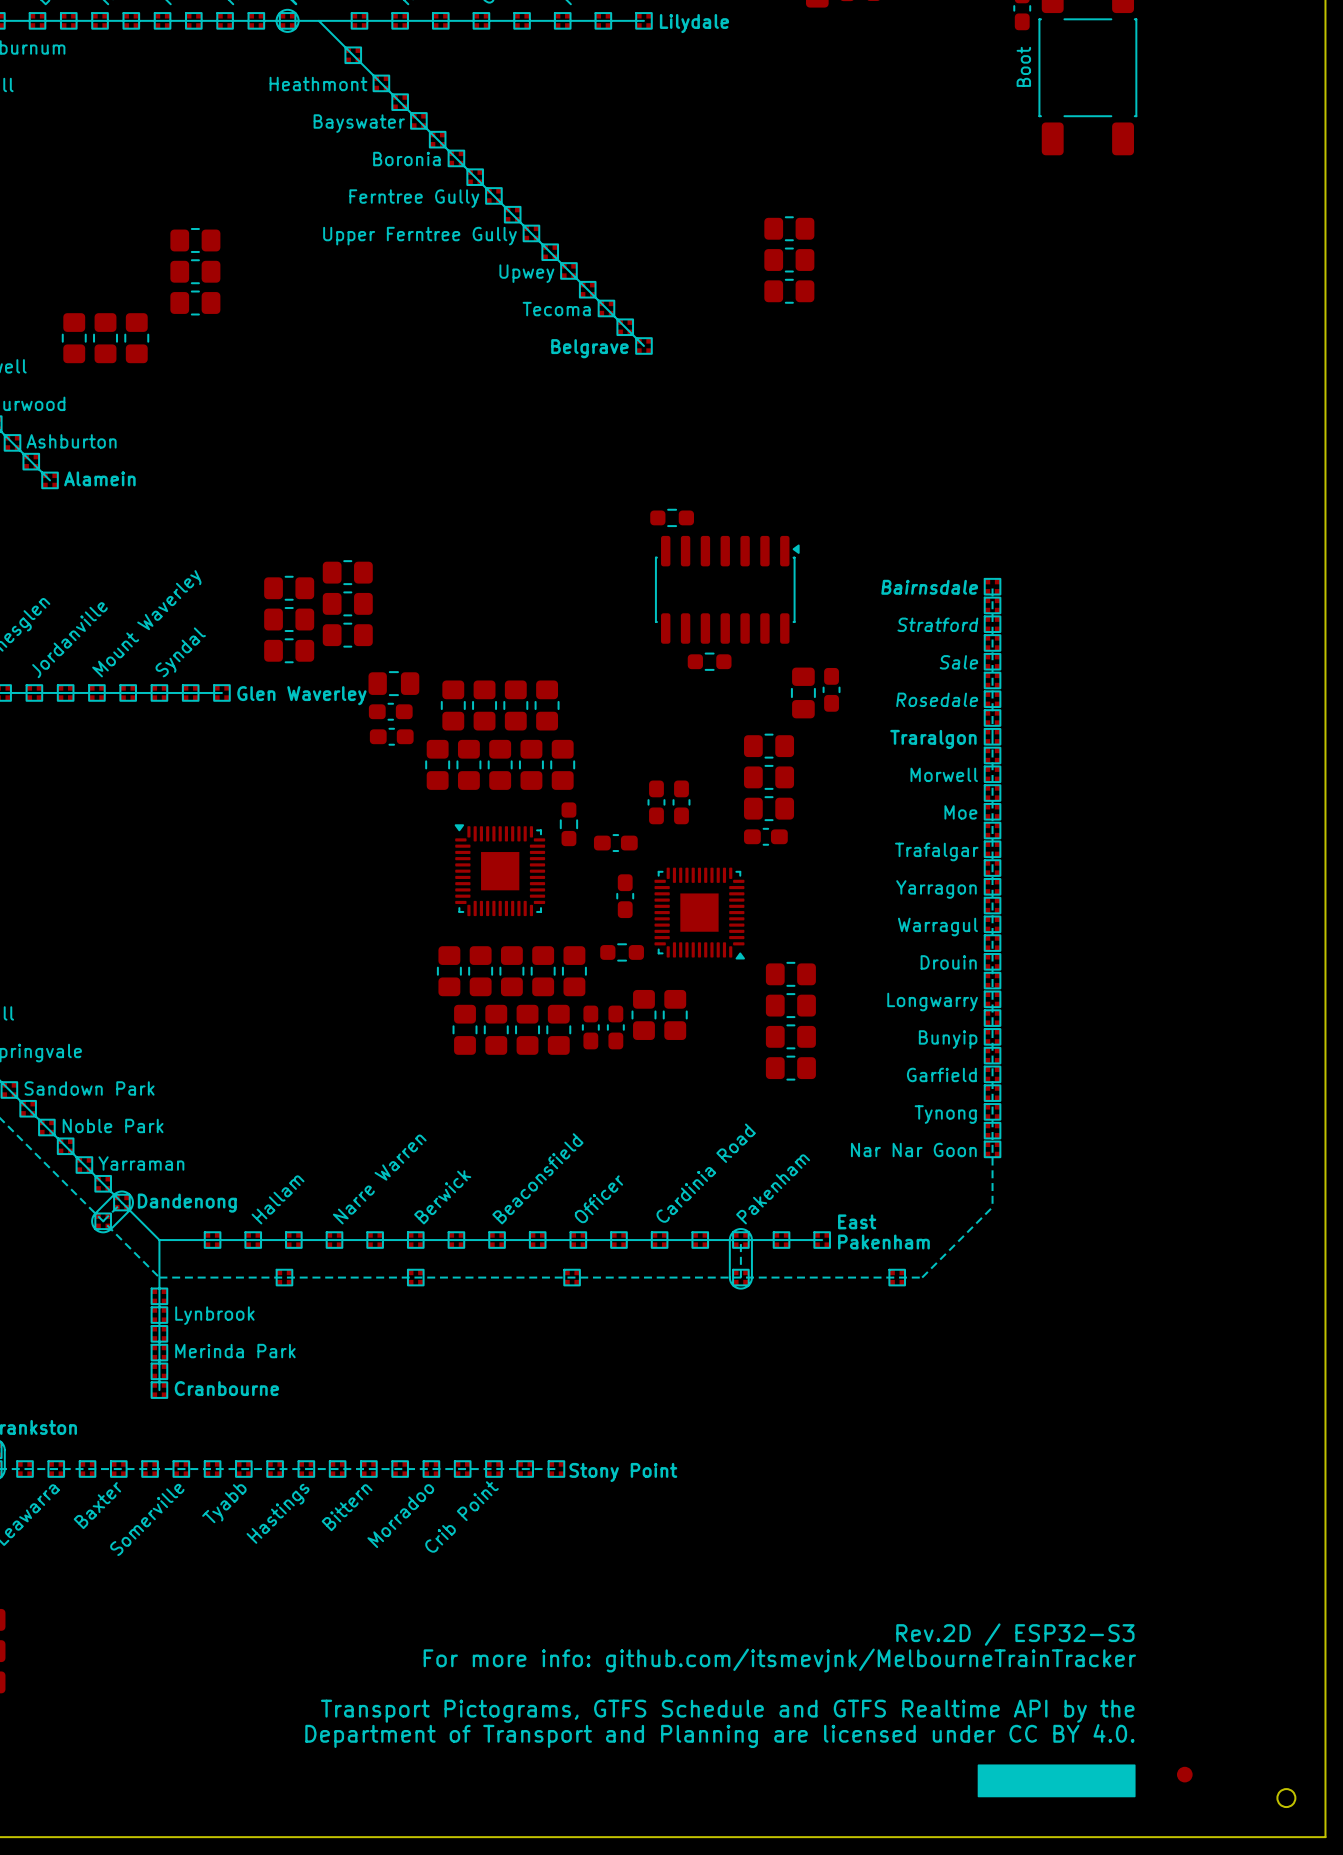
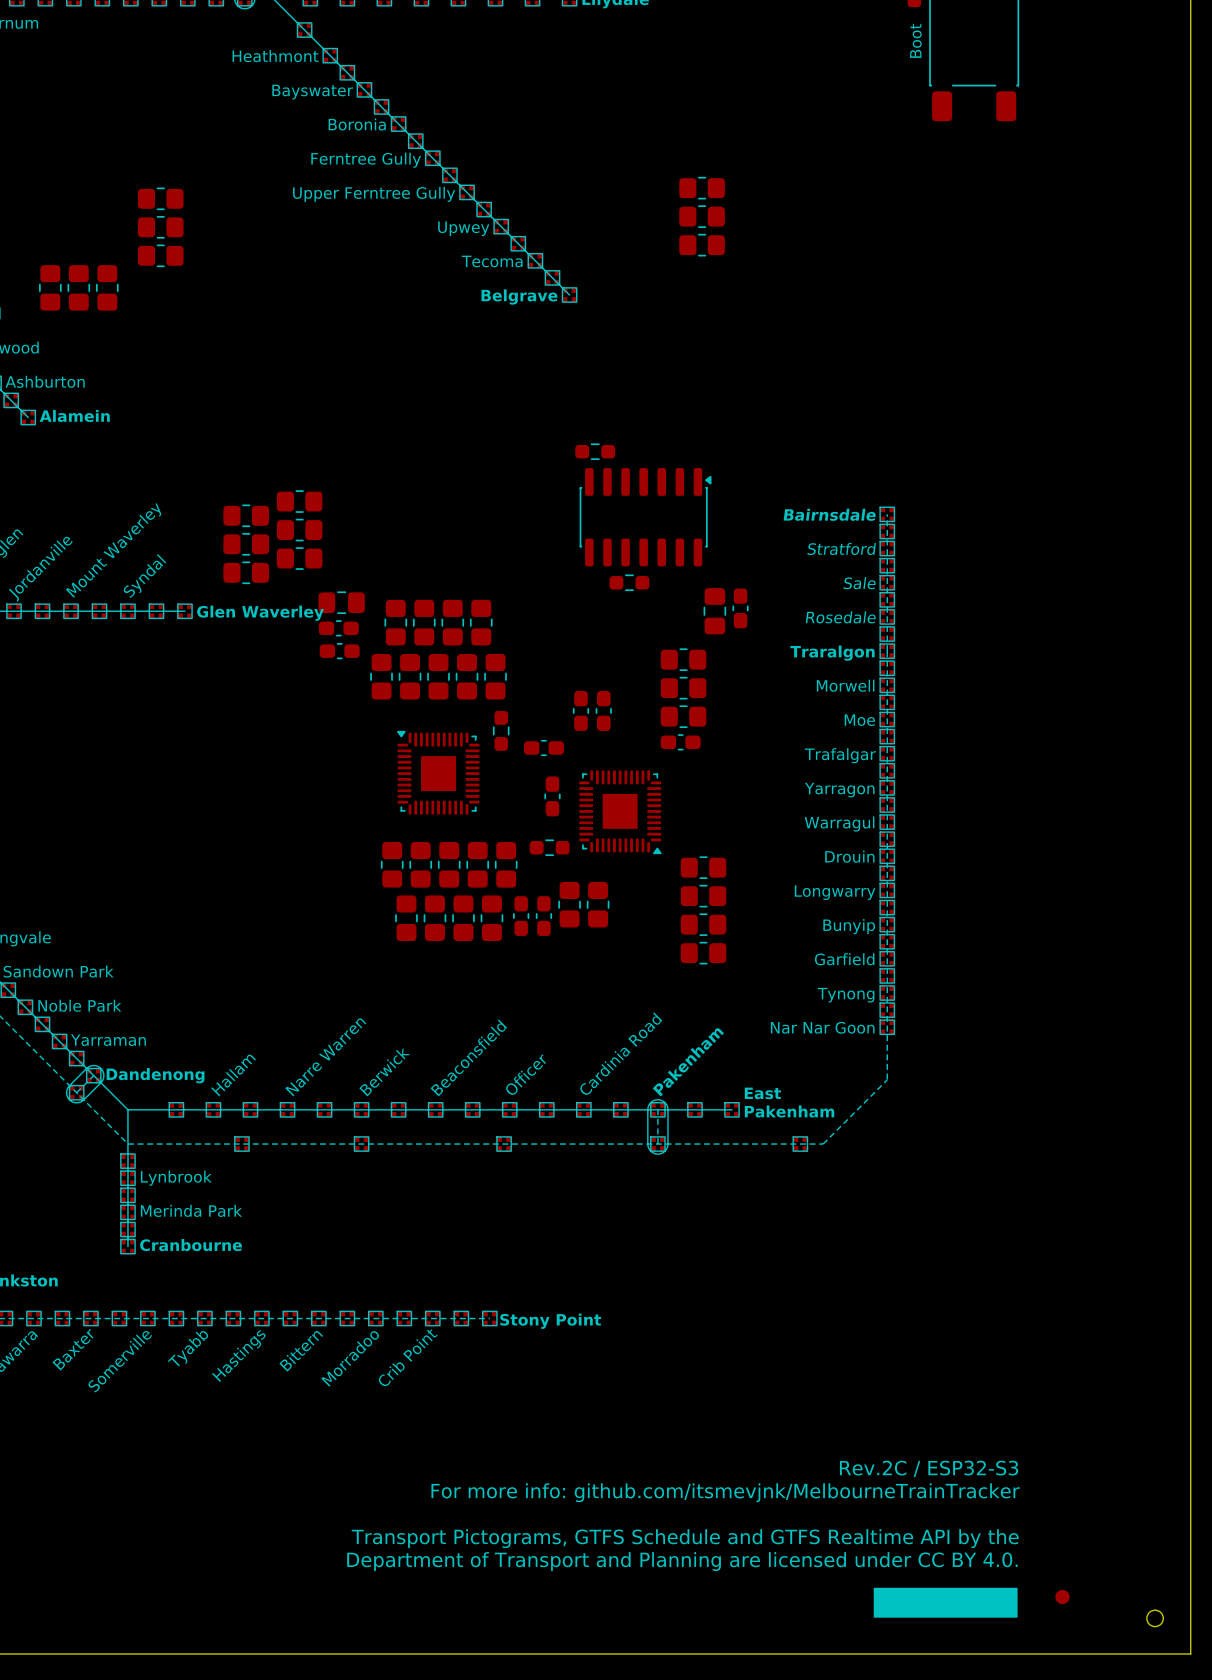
text: Rev.2D / ESP32-S3 (1015, 1634) -> Rev.2C / ESP32-S3 (929, 1468)

